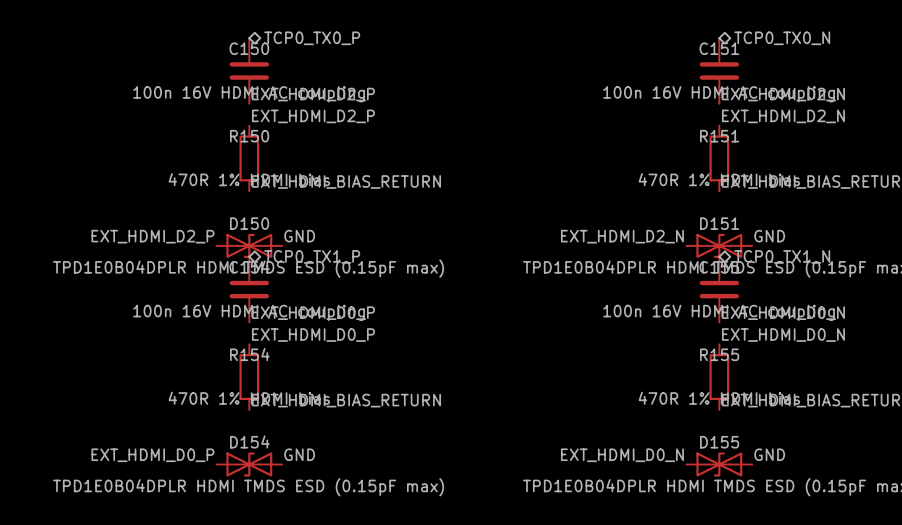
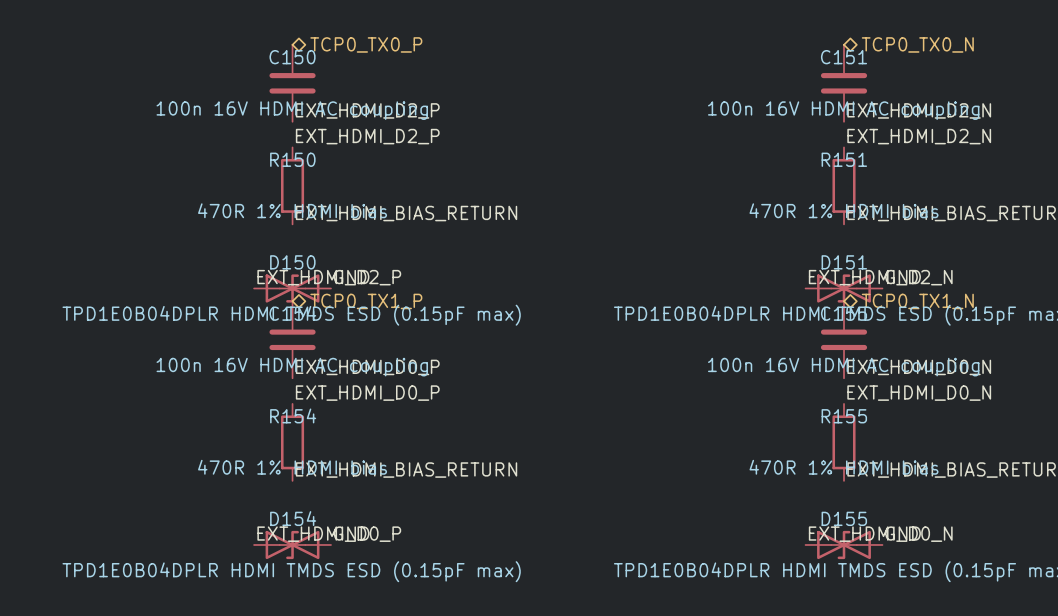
label position: EXT_HDMI_D2_P (152, 236) -> EXT_HDMI_D2_P (329, 277)
label position: EXT_HDMI_D2_N (622, 236) -> EXT_HDMI_D2_N (880, 277)
label position: EXT_HDMI_D0_P (152, 455) -> EXT_HDMI_D0_P (329, 534)
label position: EXT_HDMI_D0_N (622, 455) -> EXT_HDMI_D0_N (880, 534)

